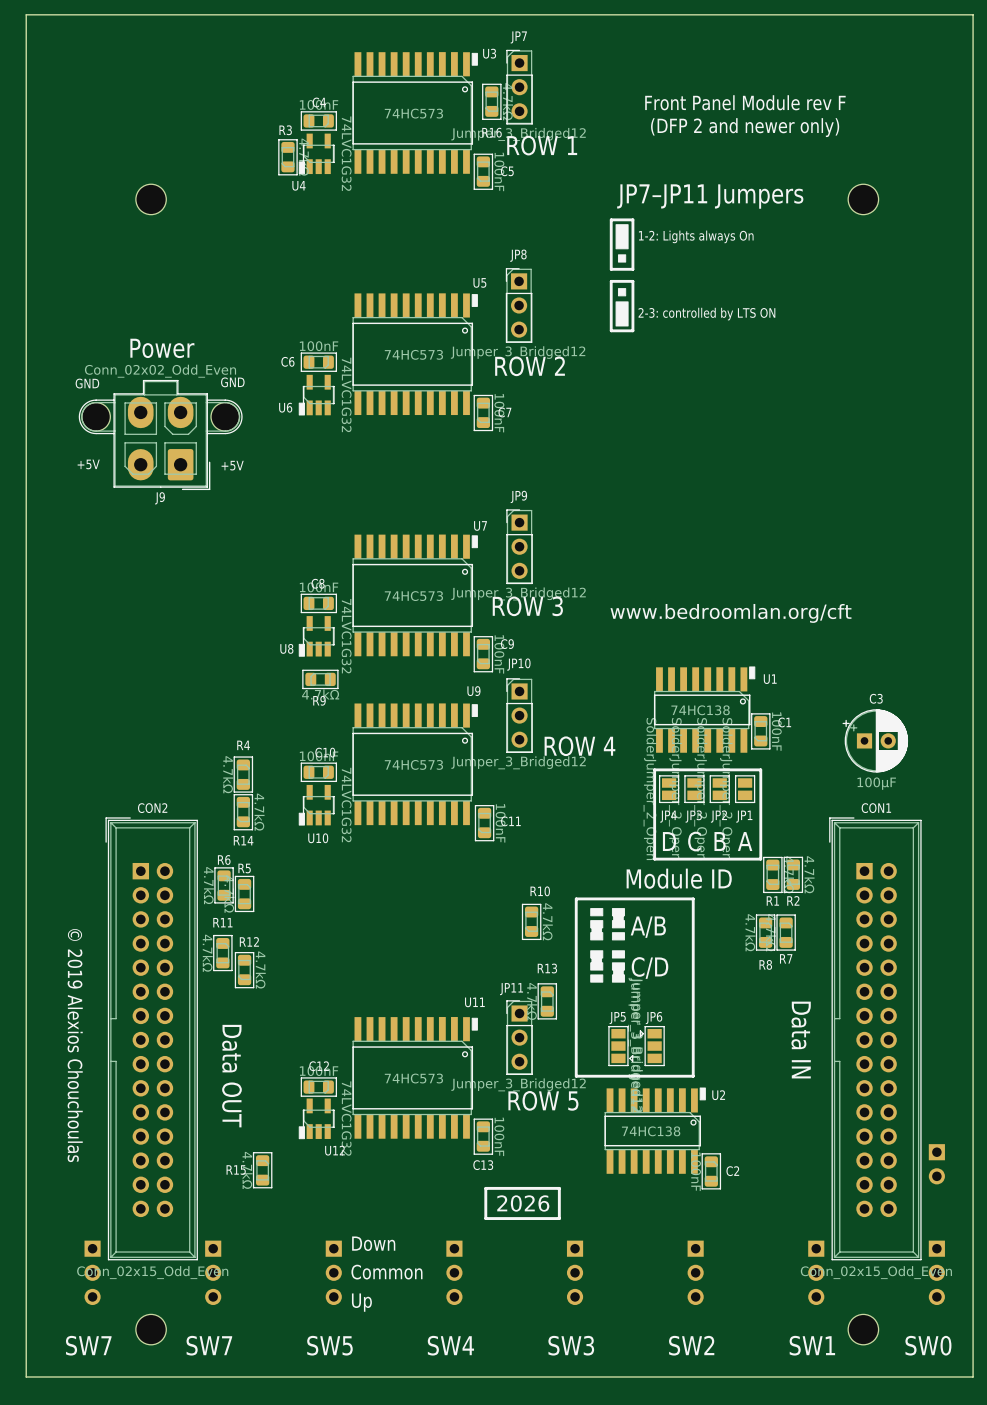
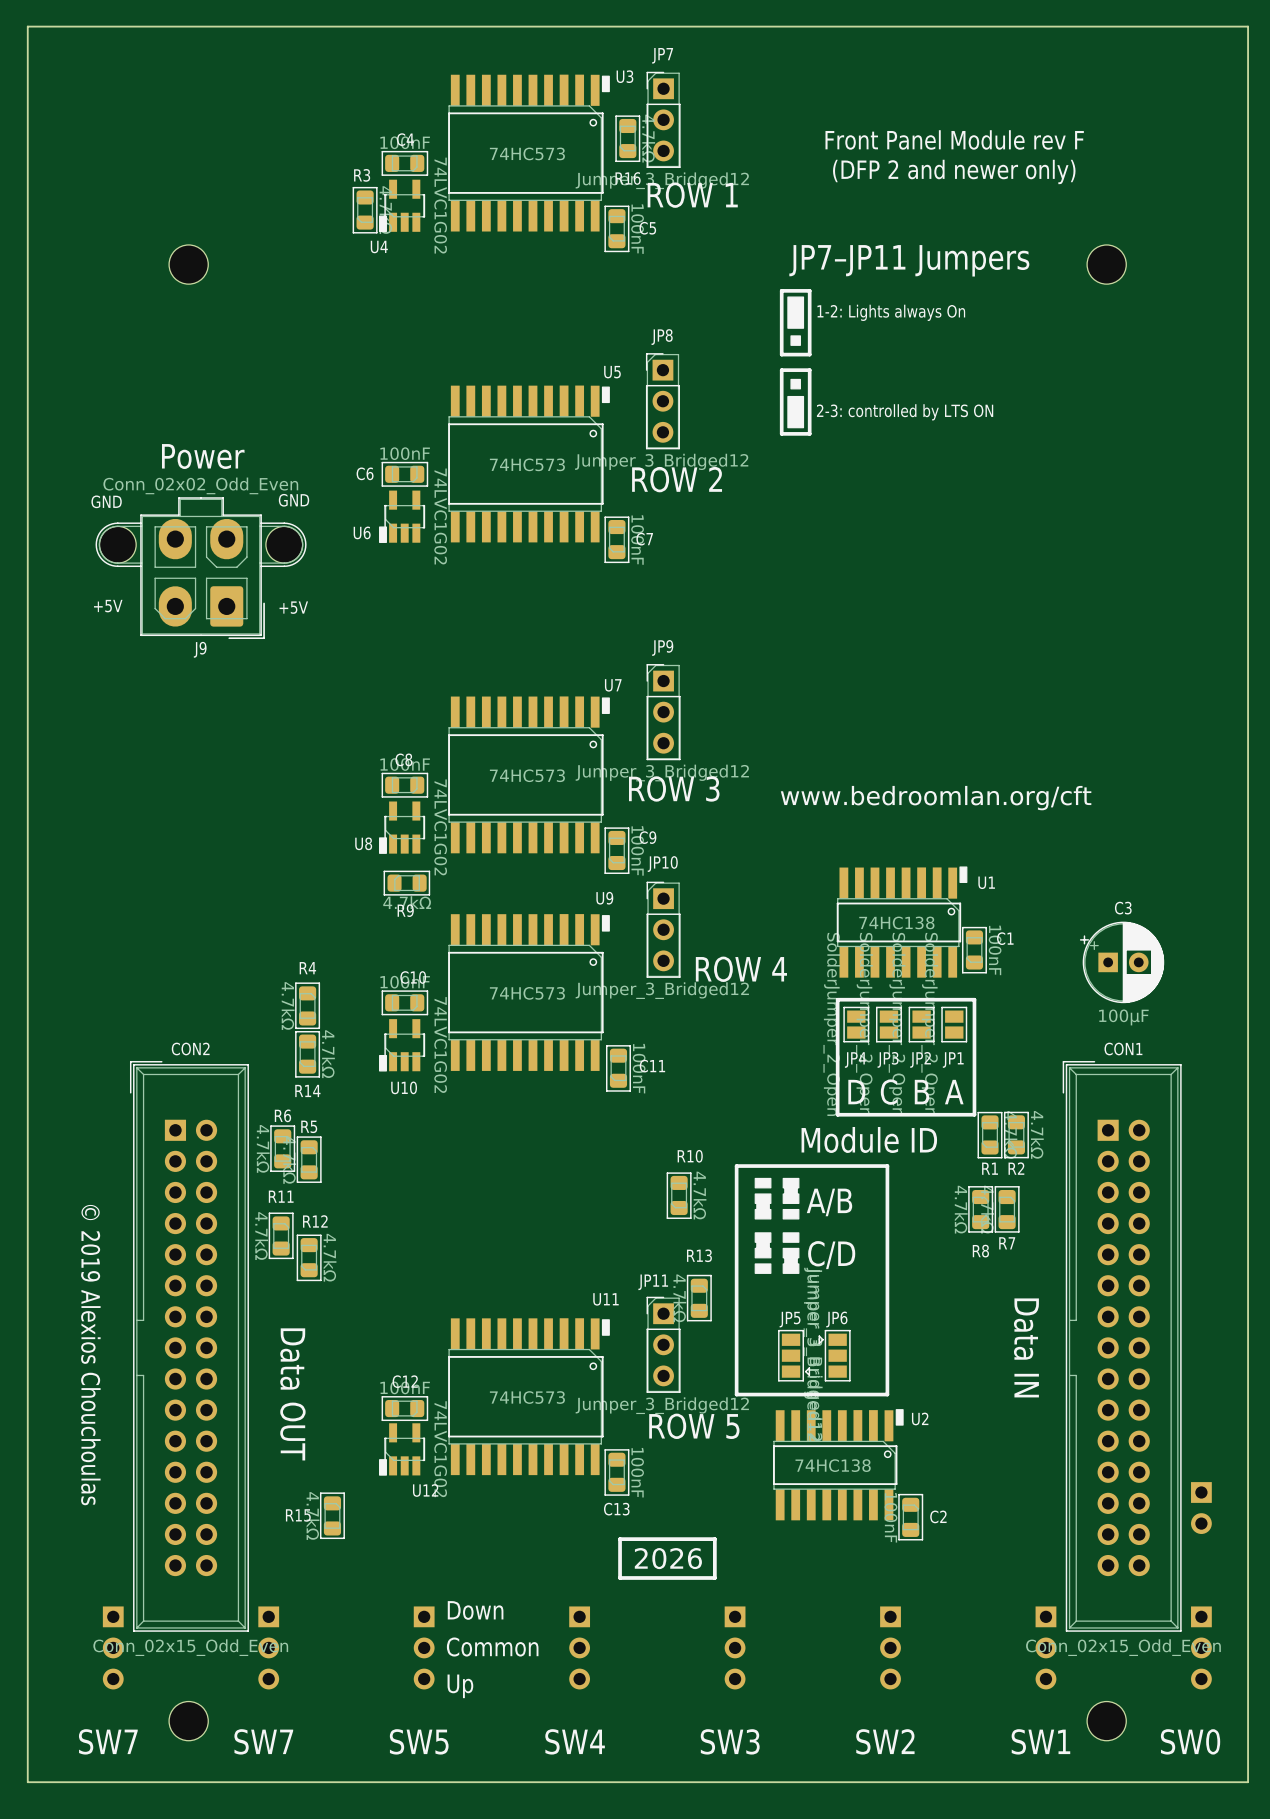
U4 value: 74LVC1G32 (346, 153) -> 74LVC1G02 (440, 205)
U6 value: 74LVC1G32 (346, 394) -> 74LVC1G02 (440, 516)
U8 value: 74LVC1G32 (346, 636) -> 74LVC1G02 (440, 827)
U10 value: 74LVC1G32 (346, 805) -> 74LVC1G02 (440, 1045)
U12 value: 74LVC1G32 (346, 1118) -> 74LVC1G02 (440, 1449)

